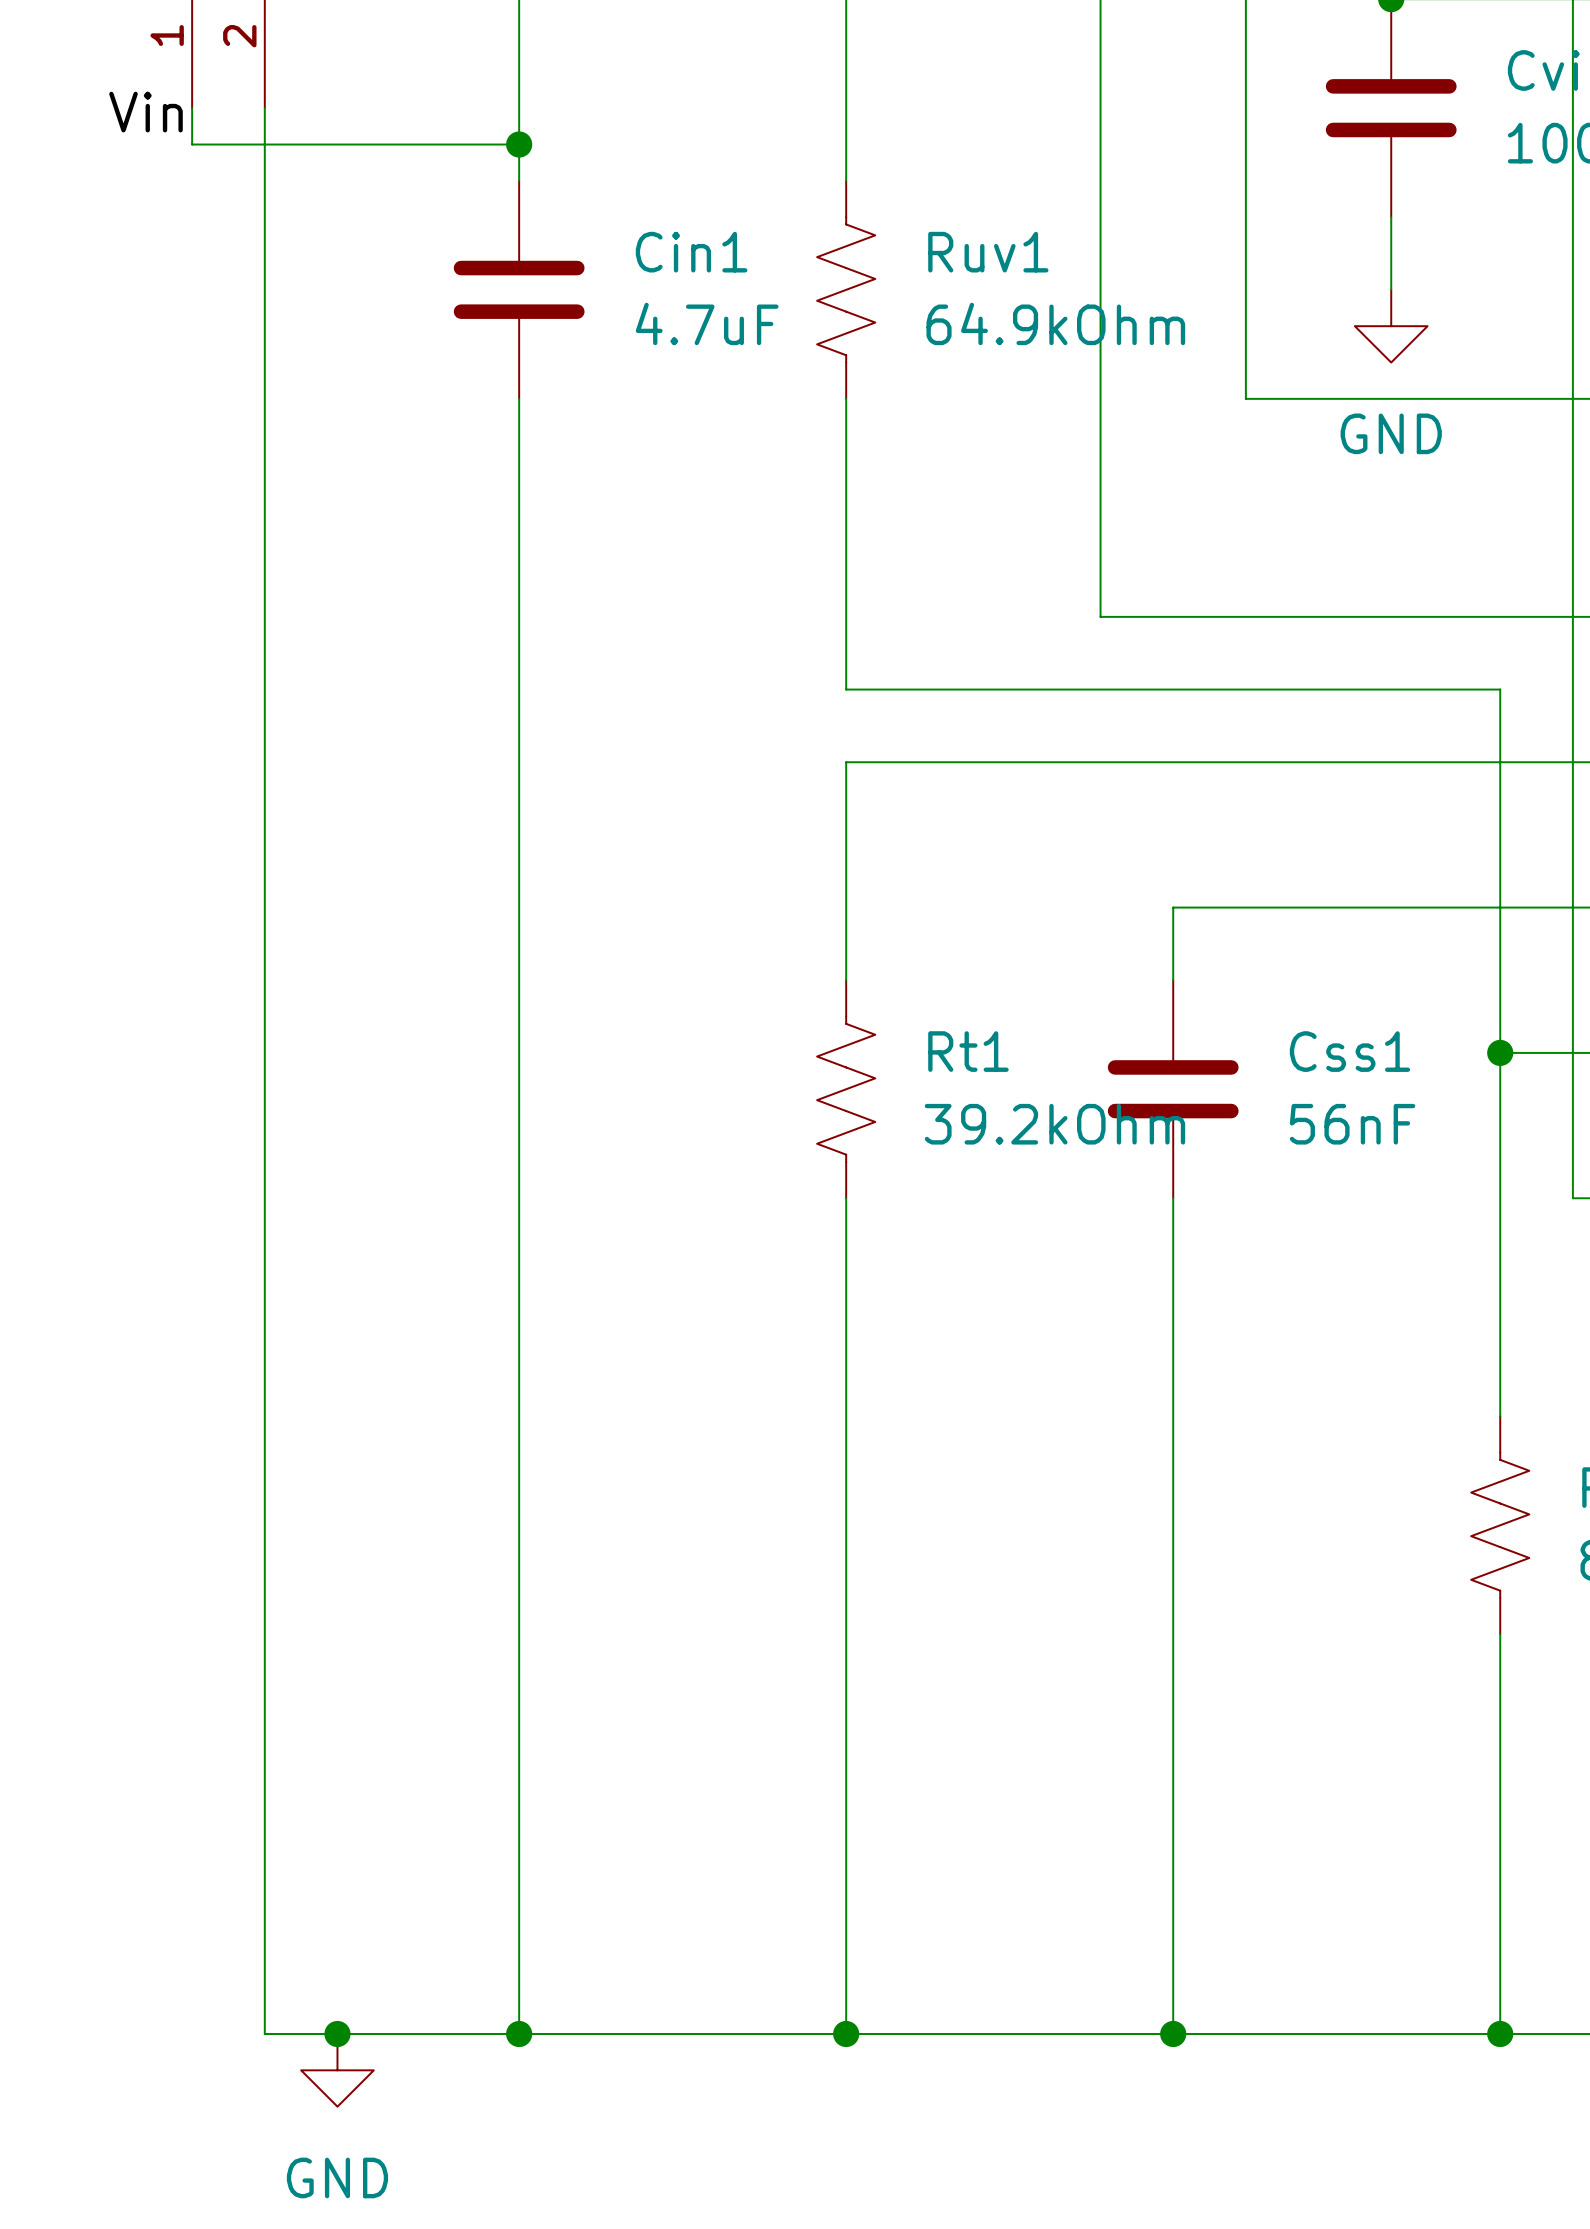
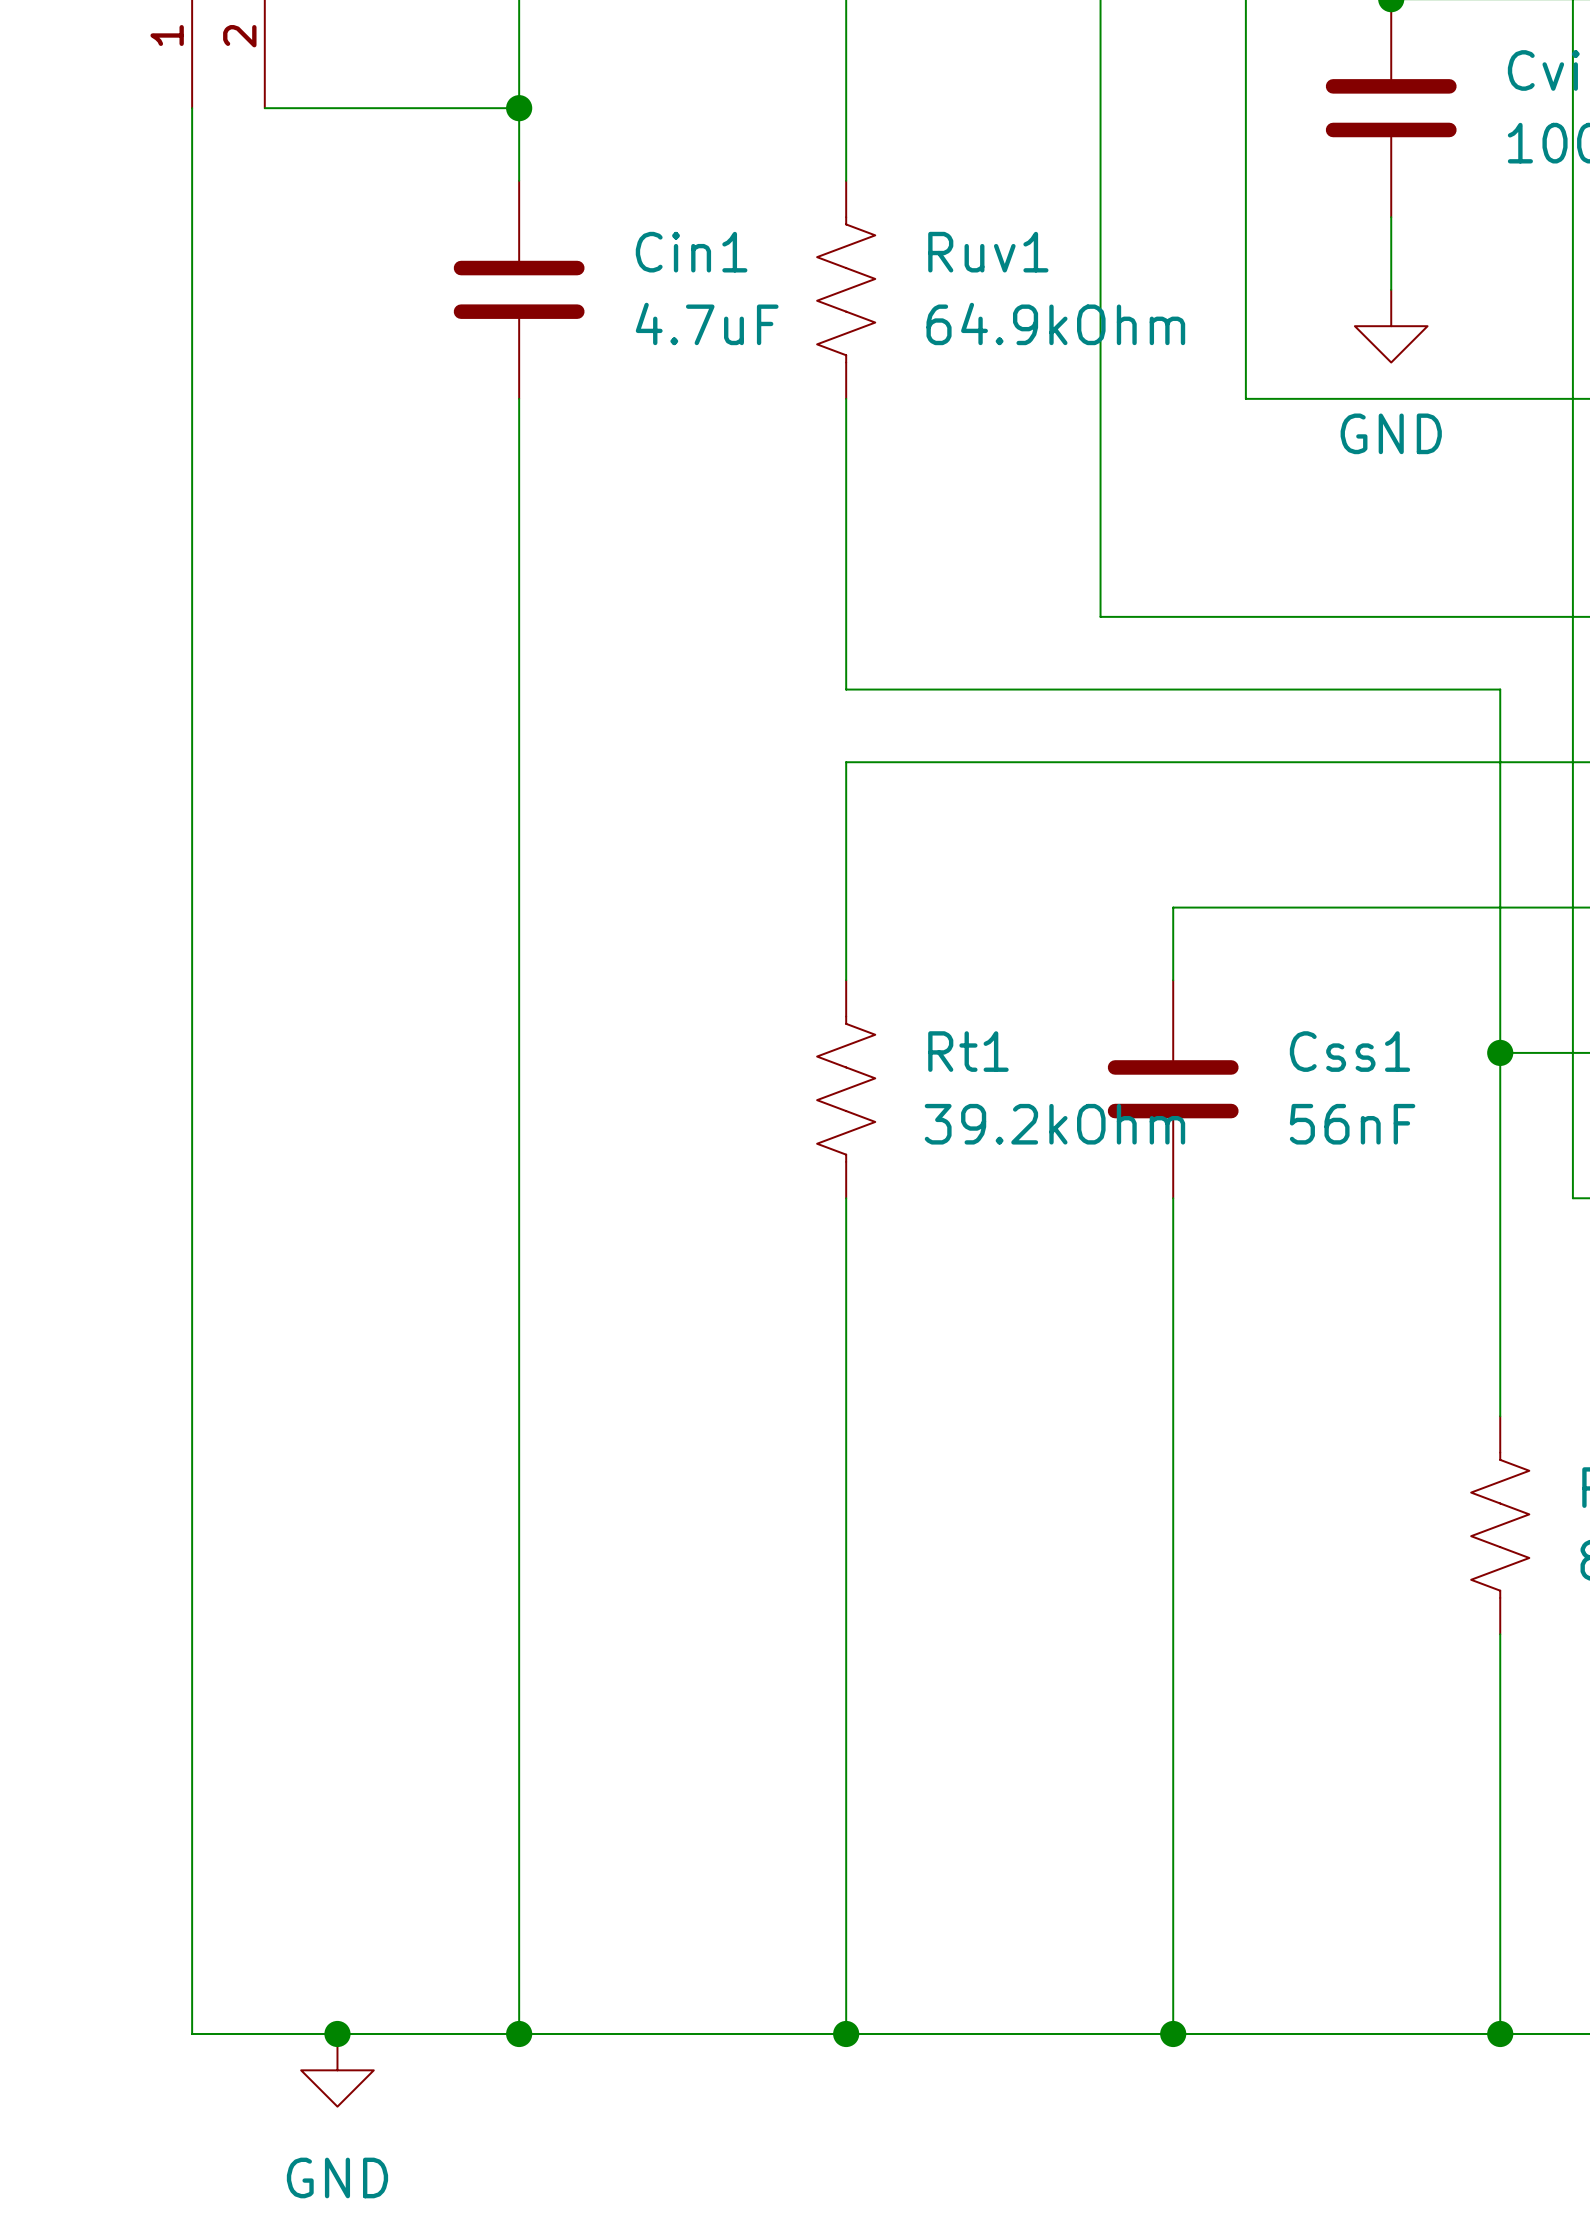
wire: (264, 108) (264, 2033) -> (192, 144) (192, 2033) (264, 2033)
wire: none -> (264, 108) (519, 108)
label: Vin (146, 112) -> none
wire: (192, 144) (519, 144) -> none
junction position: (519, 144) -> (519, 108)

